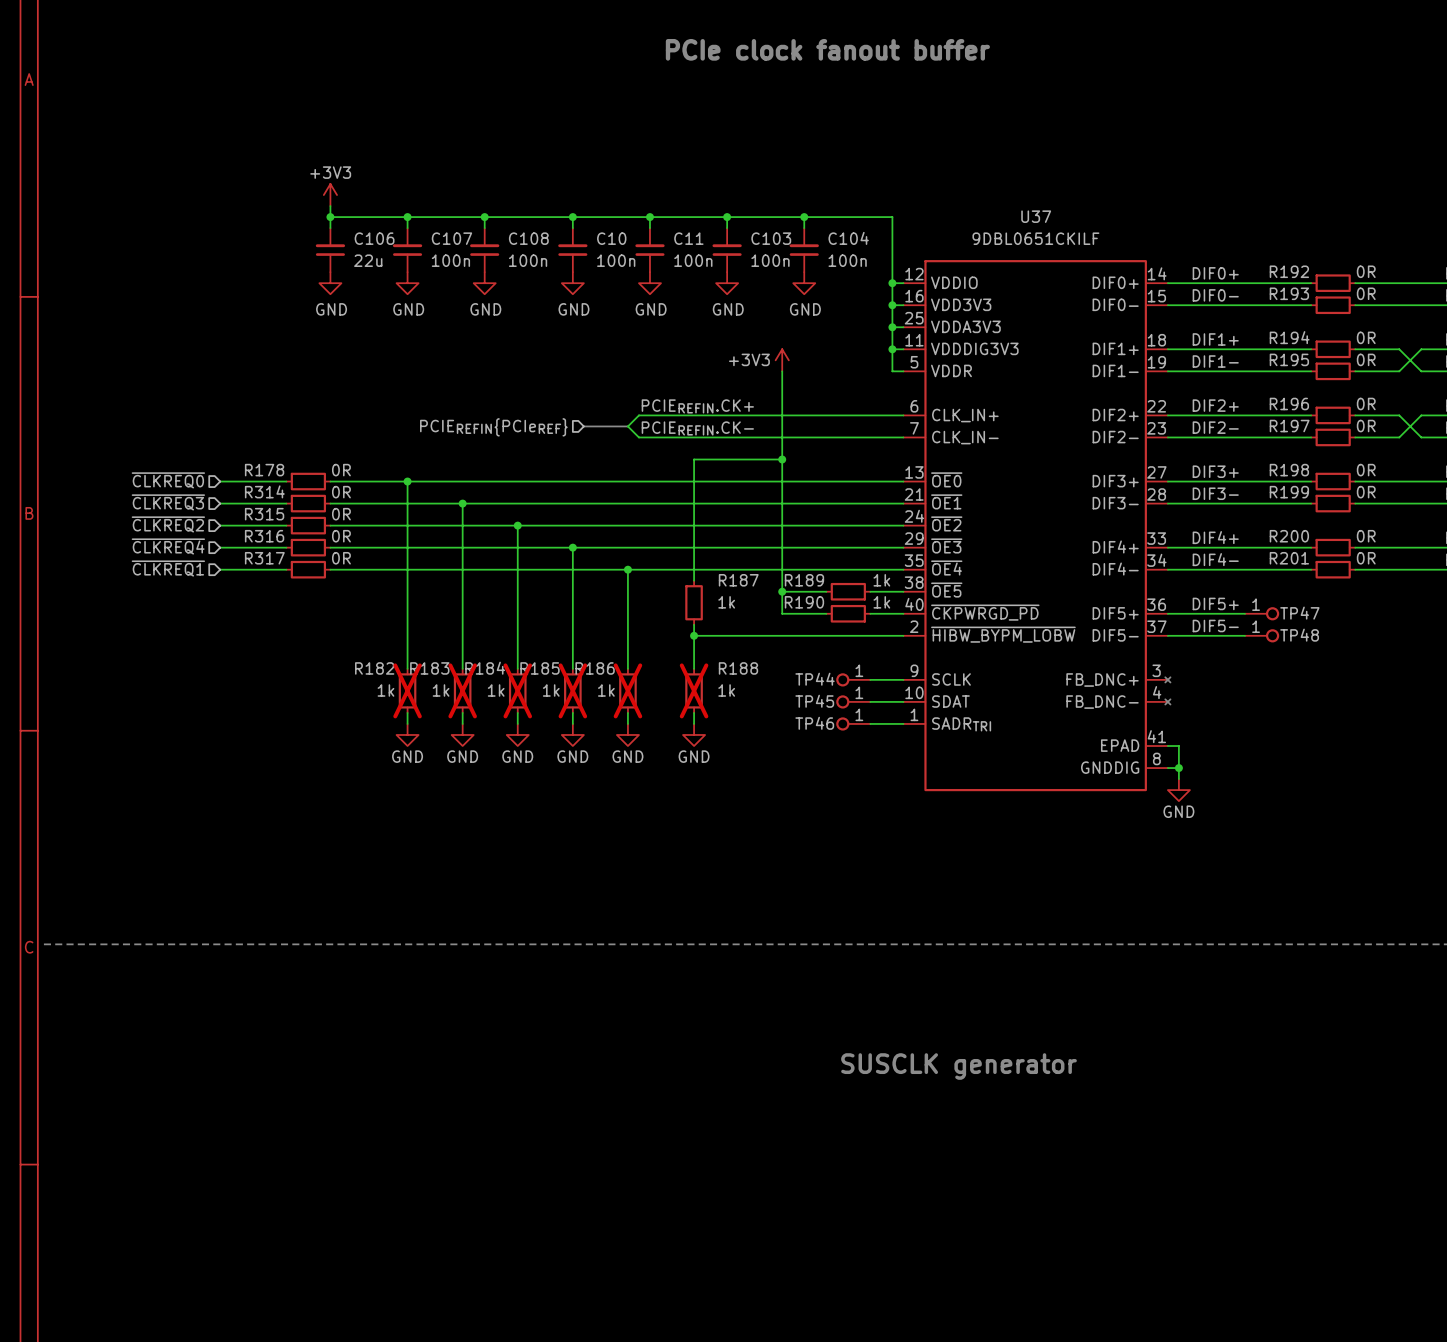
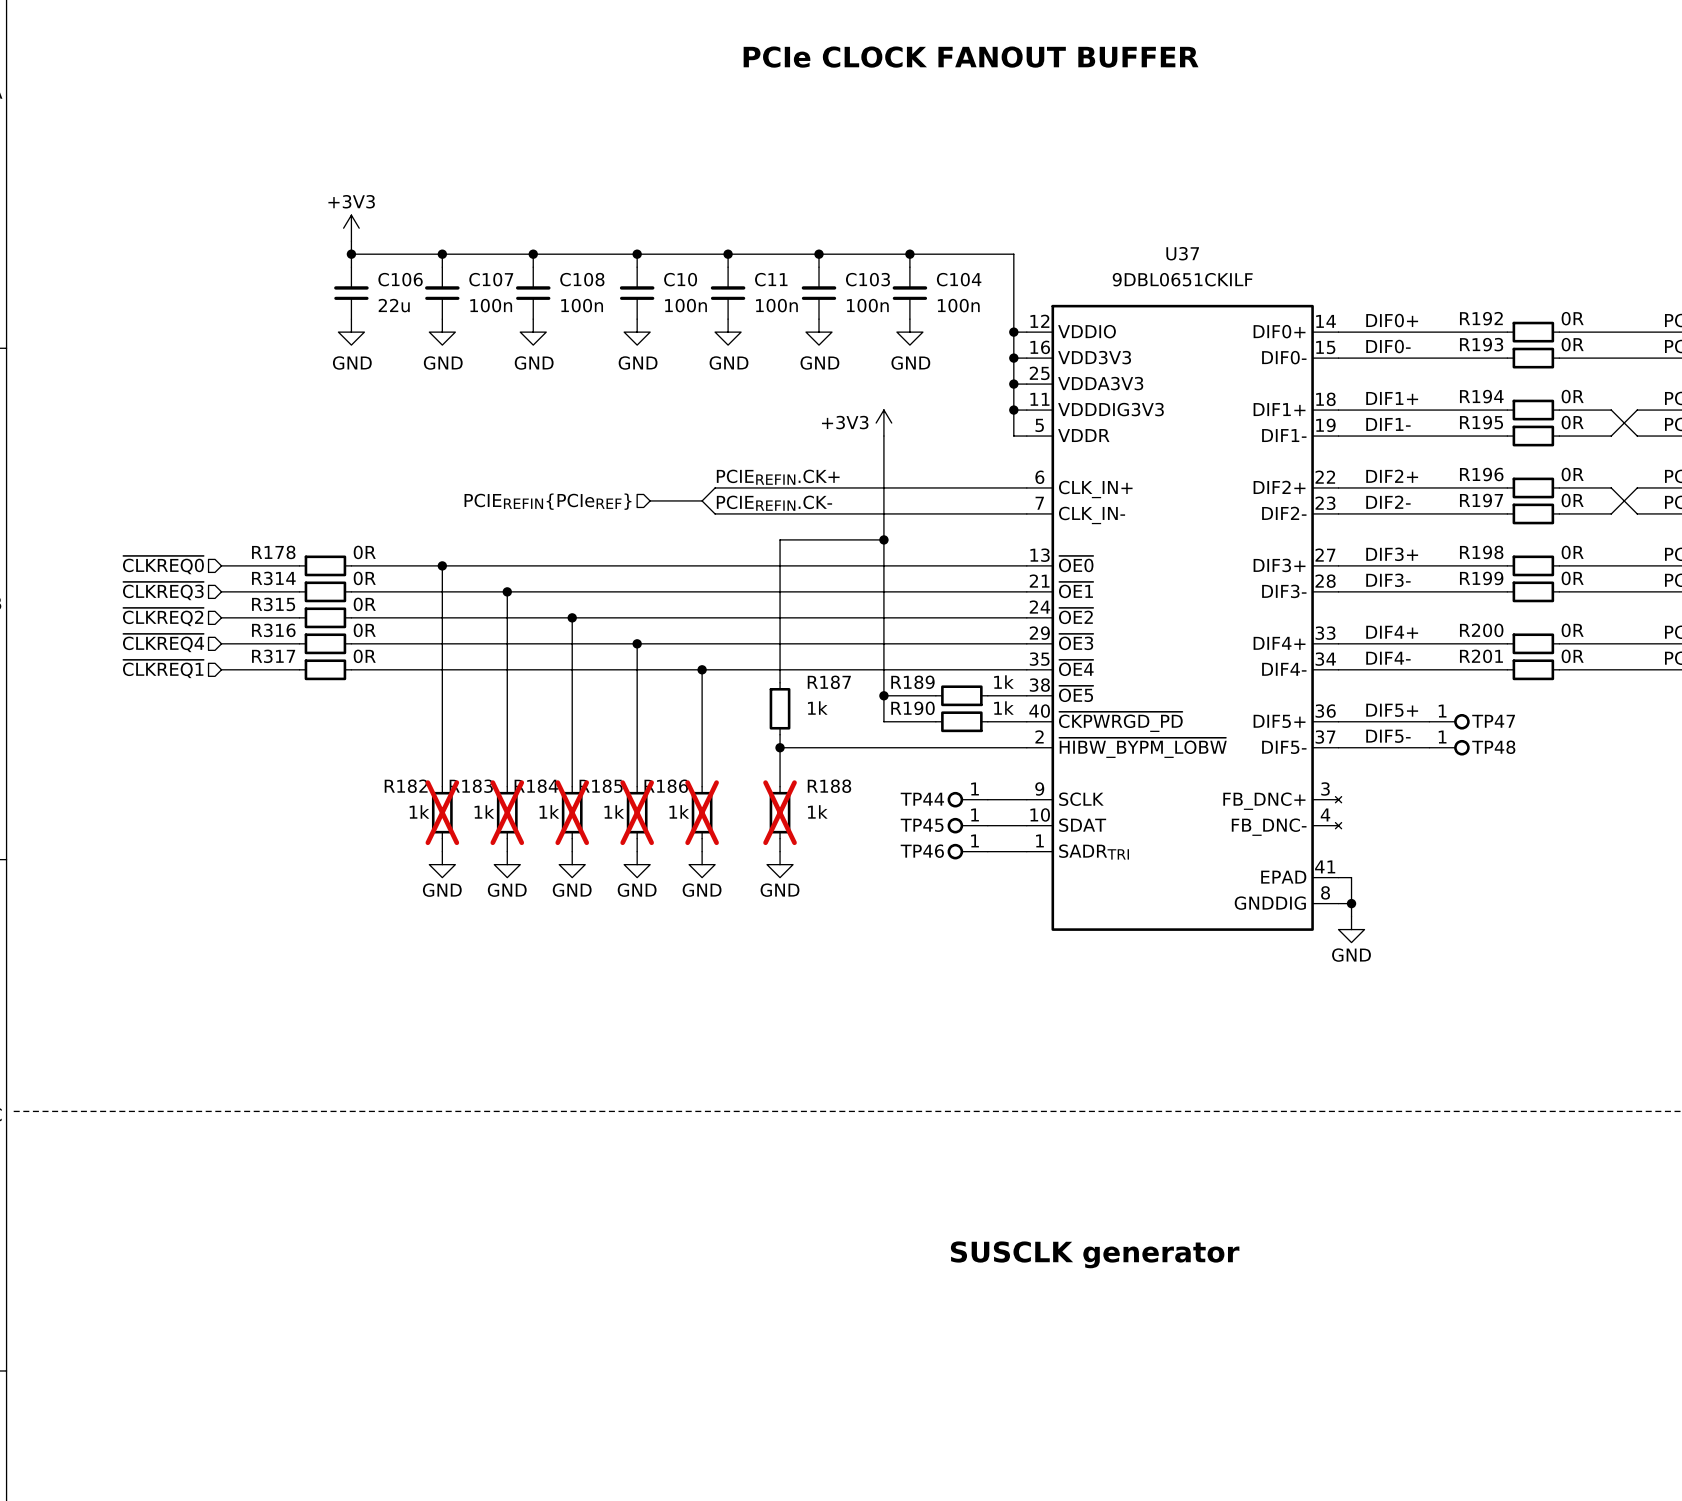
text: PCIe clock fanout buffer (827, 49) -> PCIe CLOCK FANOUT BUFFER (971, 57)

